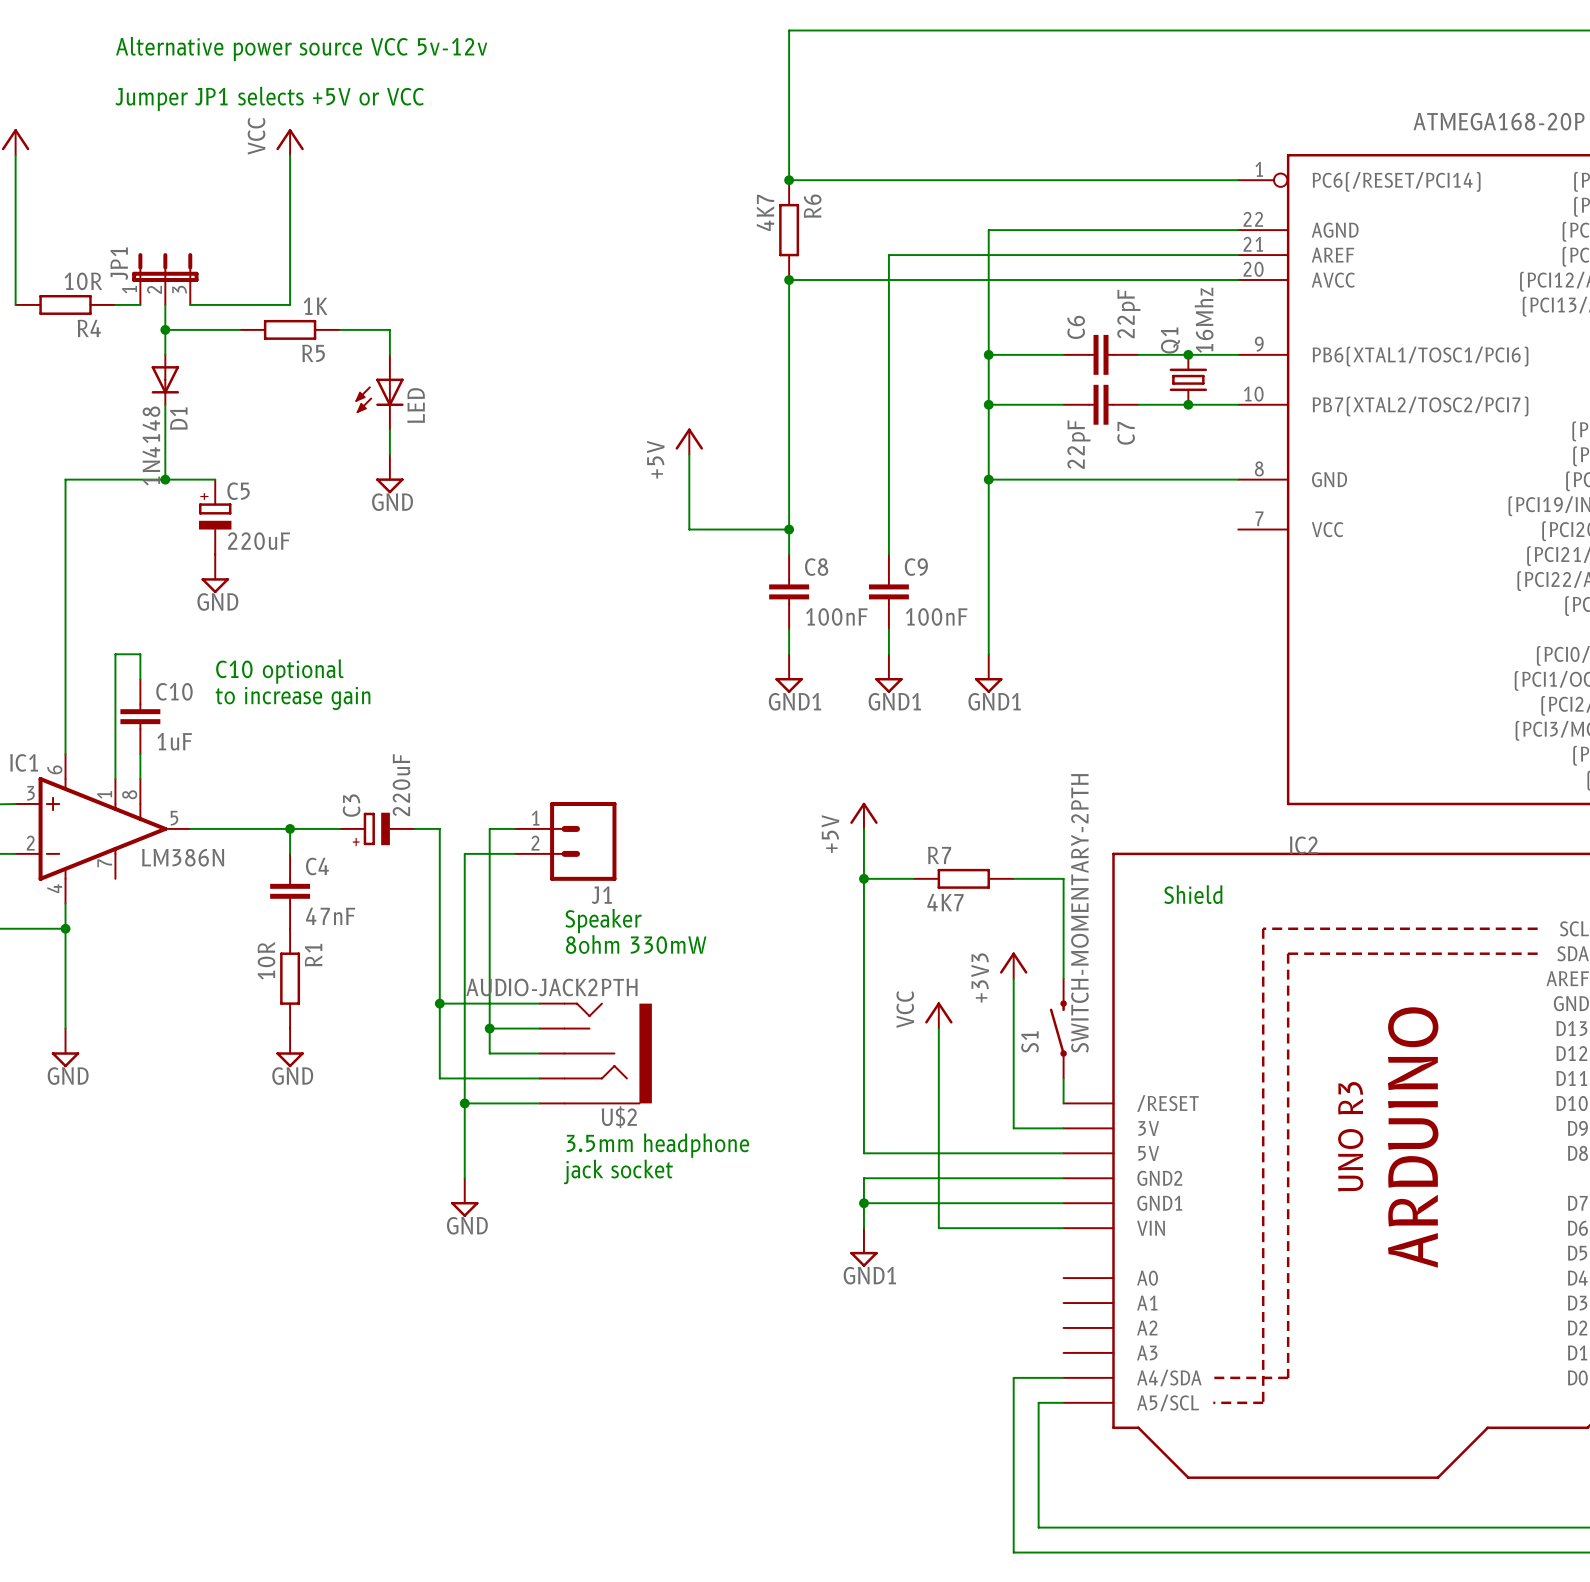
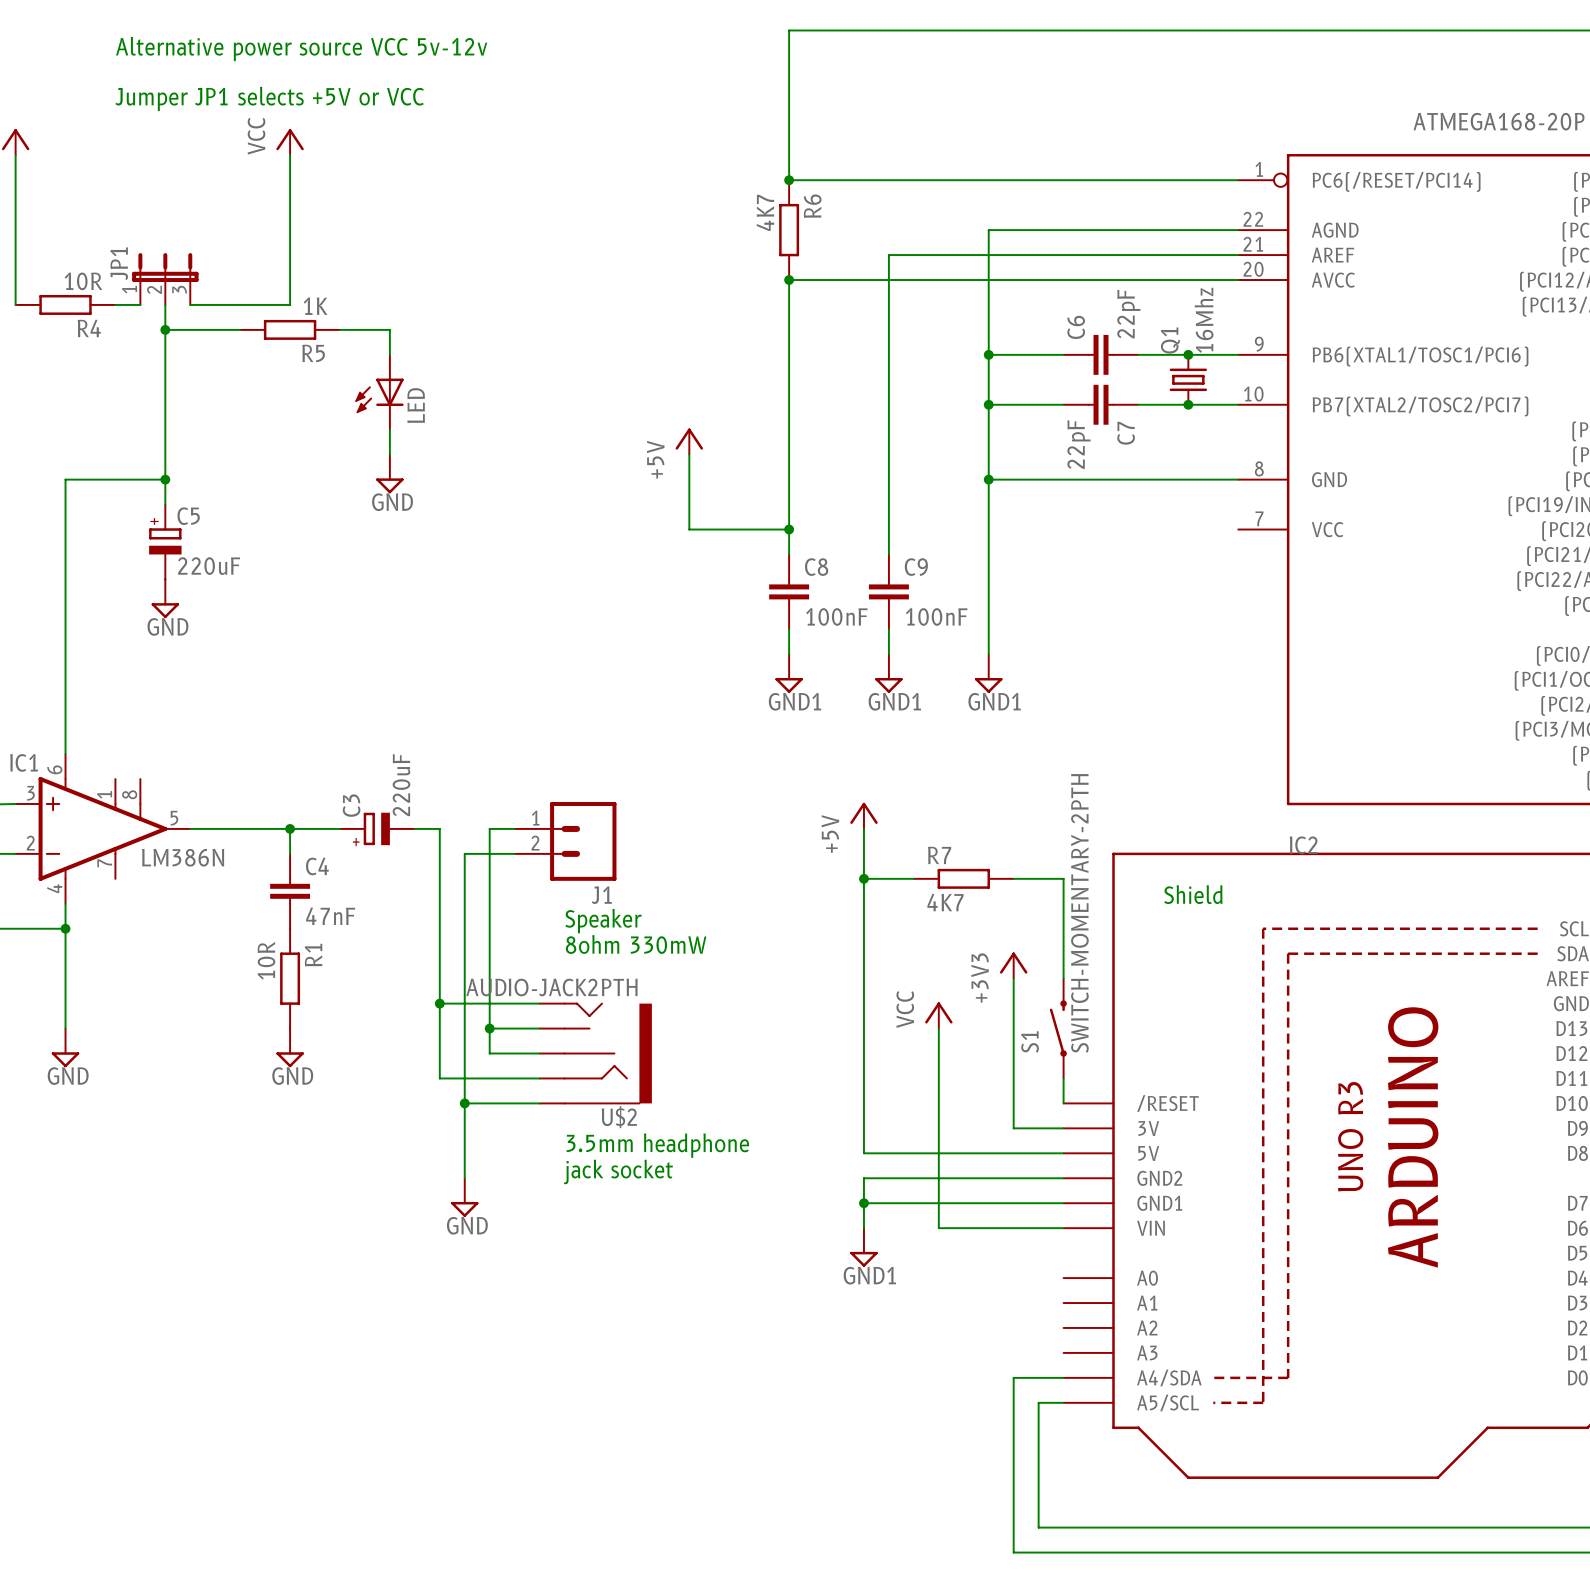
D1: 1N4148 (165, 379) -> none
wire: (165, 479) (215, 479) -> (165, 479) (165, 504)
C5 position: (215, 517) -> (165, 542)
power symbol position: GND (215, 573) -> GND (165, 598)
text: C10 optional (279, 671) -> none
wire: (140, 679) (140, 654) (115, 654) (115, 779) -> none
text: to increase gain (293, 698) -> none
C10: 1uF (140, 716) -> none
wire: (140, 754) (140, 779) -> none

